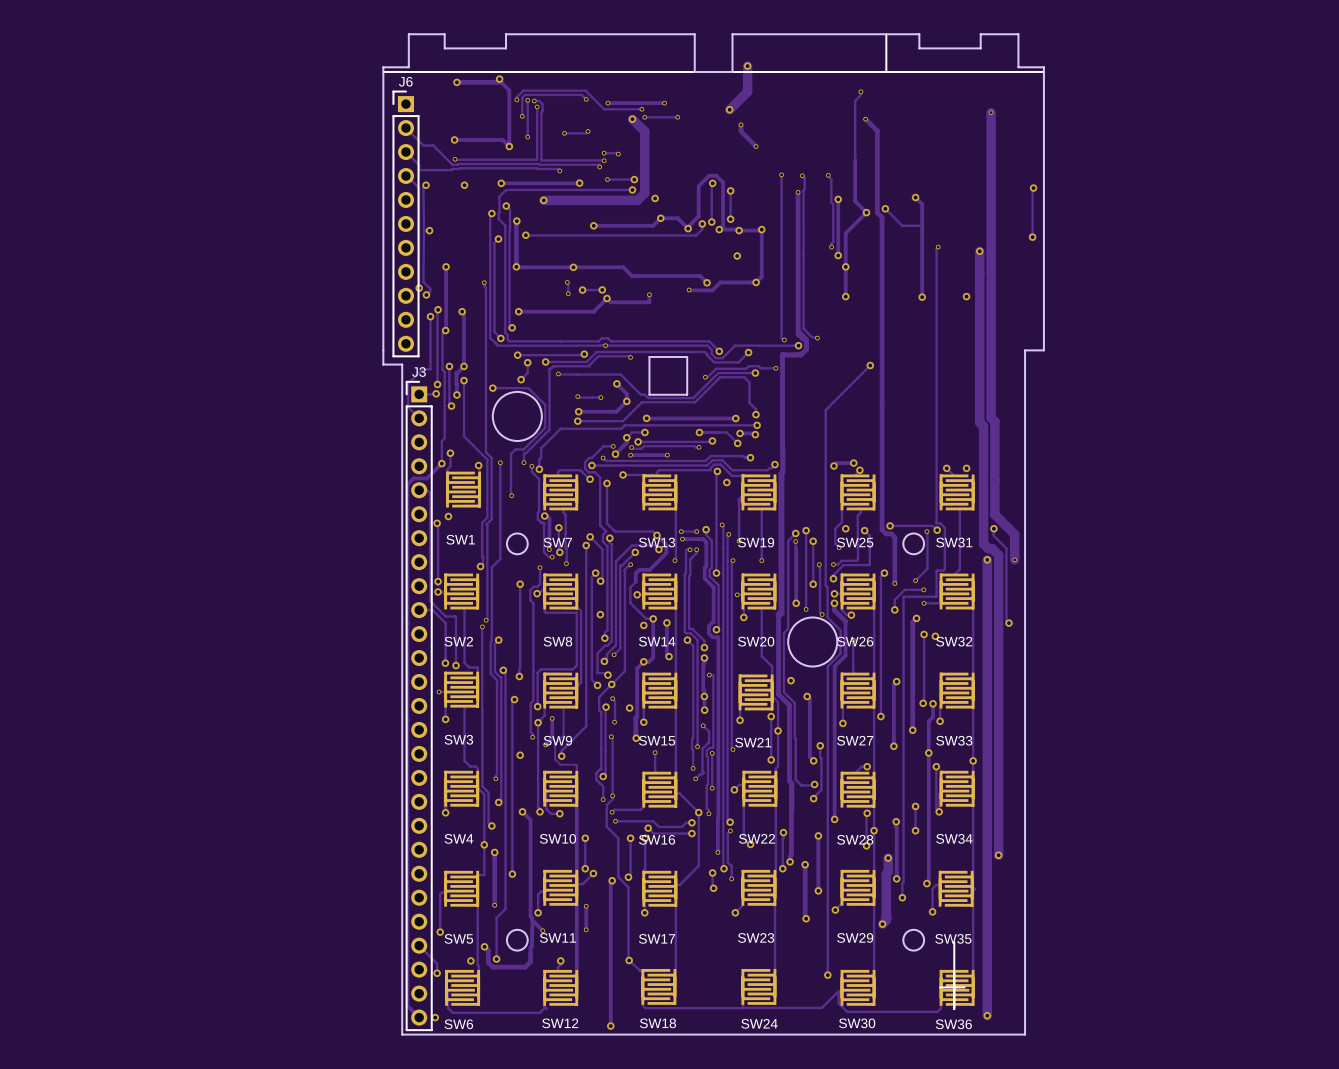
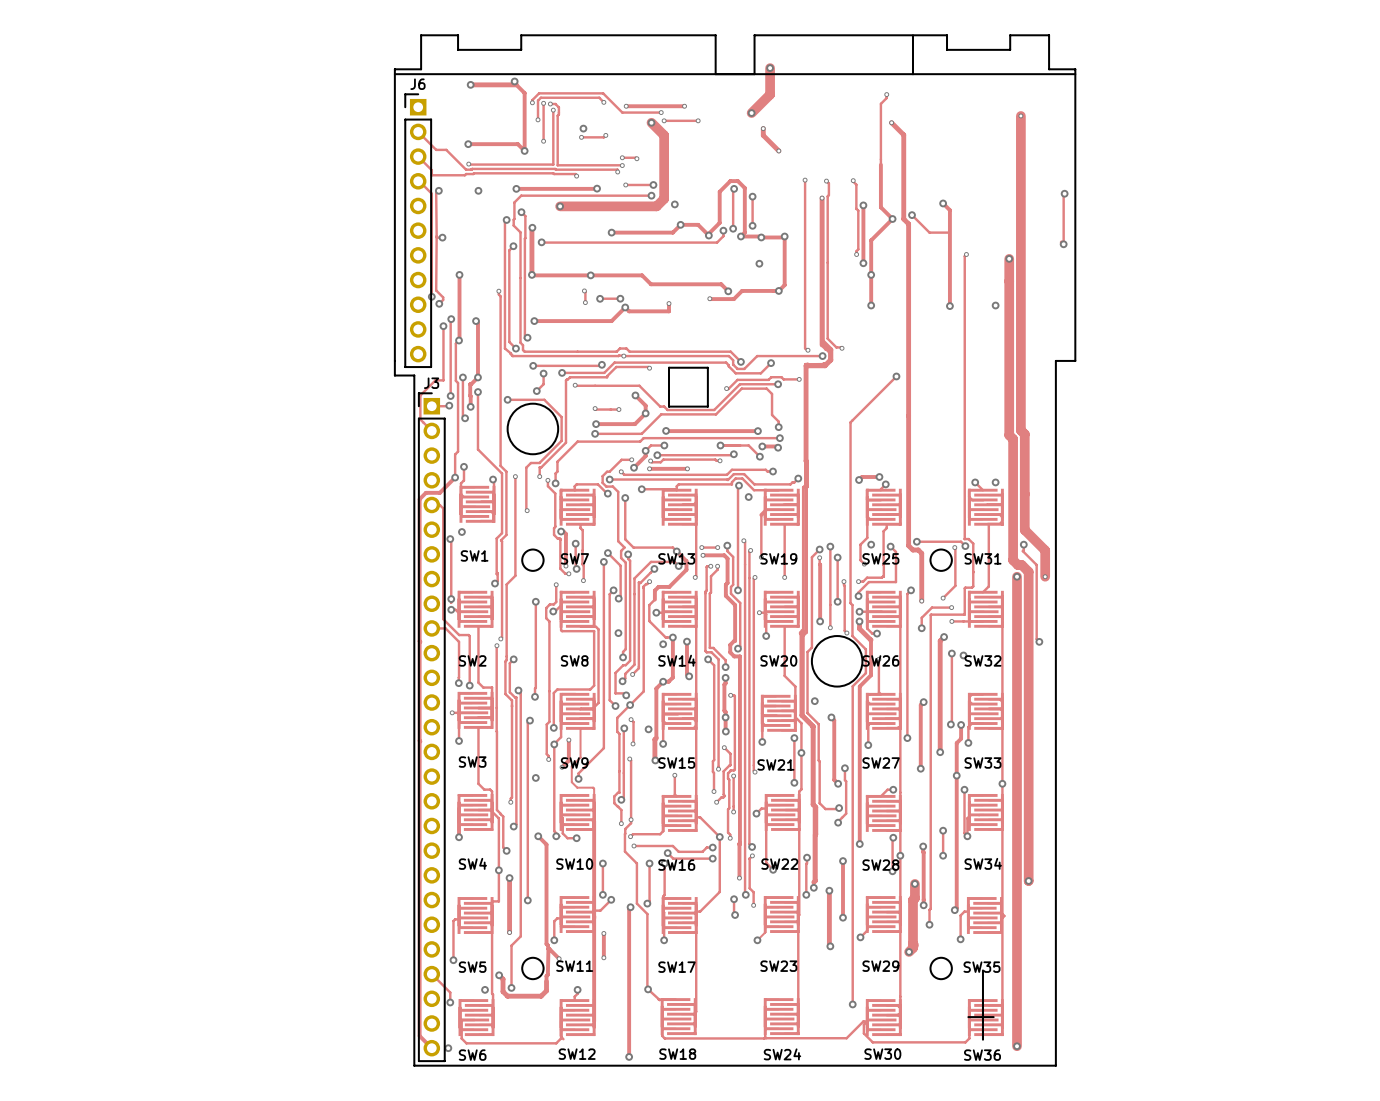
via: none -> (583, 128)

